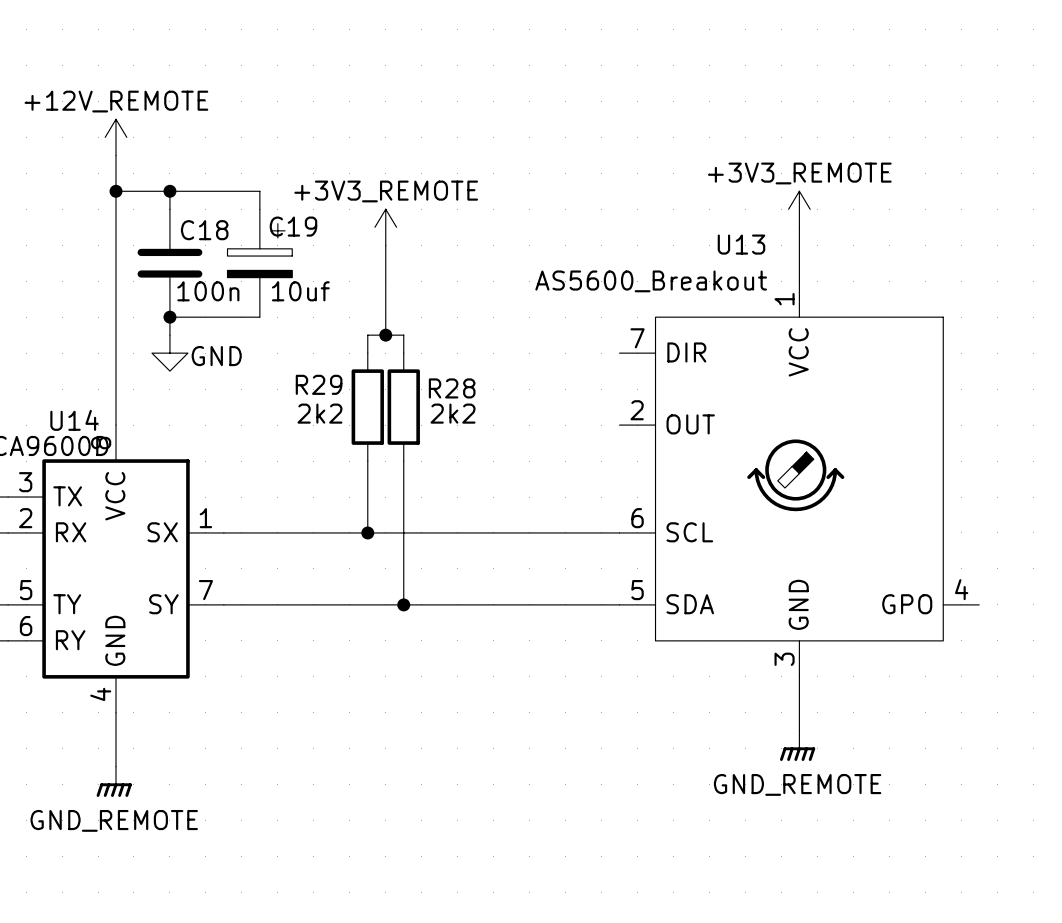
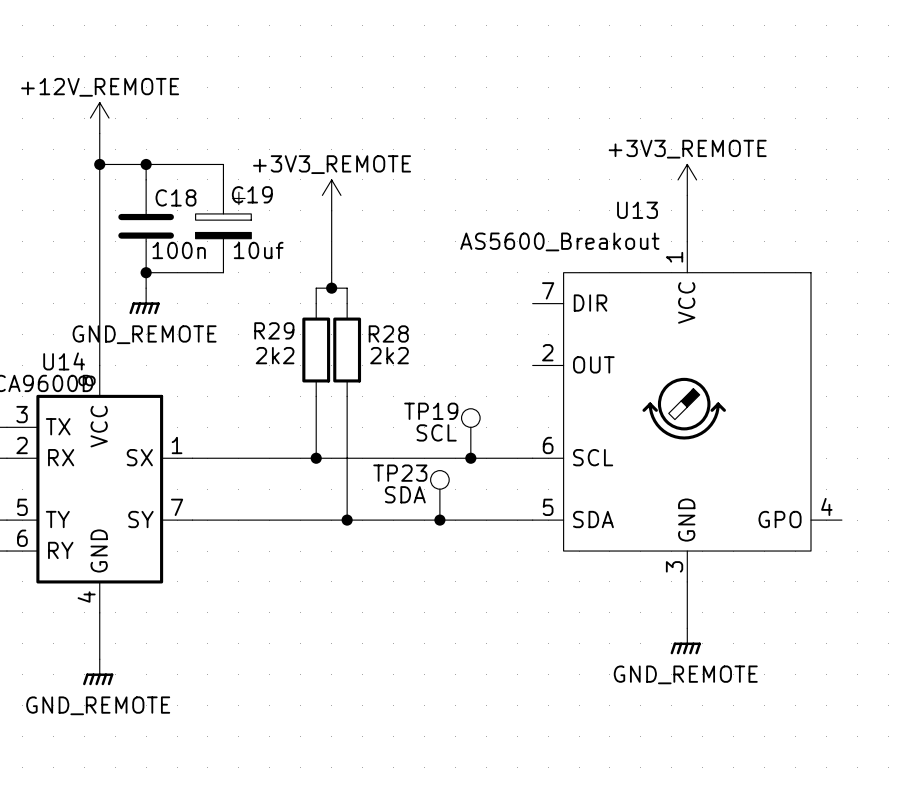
power symbol: GND (169, 353) -> GND_REMOTE (144, 301)
TP19: none -> SCL (470, 433)
junction: none -> (470, 458)
TP23: none -> SDA (439, 495)
junction: none -> (439, 520)

